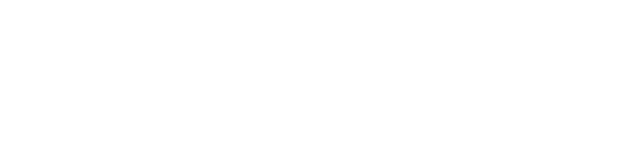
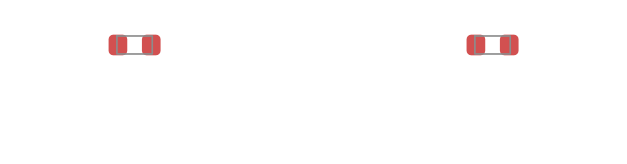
part: none -> (134, 44)
part: none -> (492, 44)

